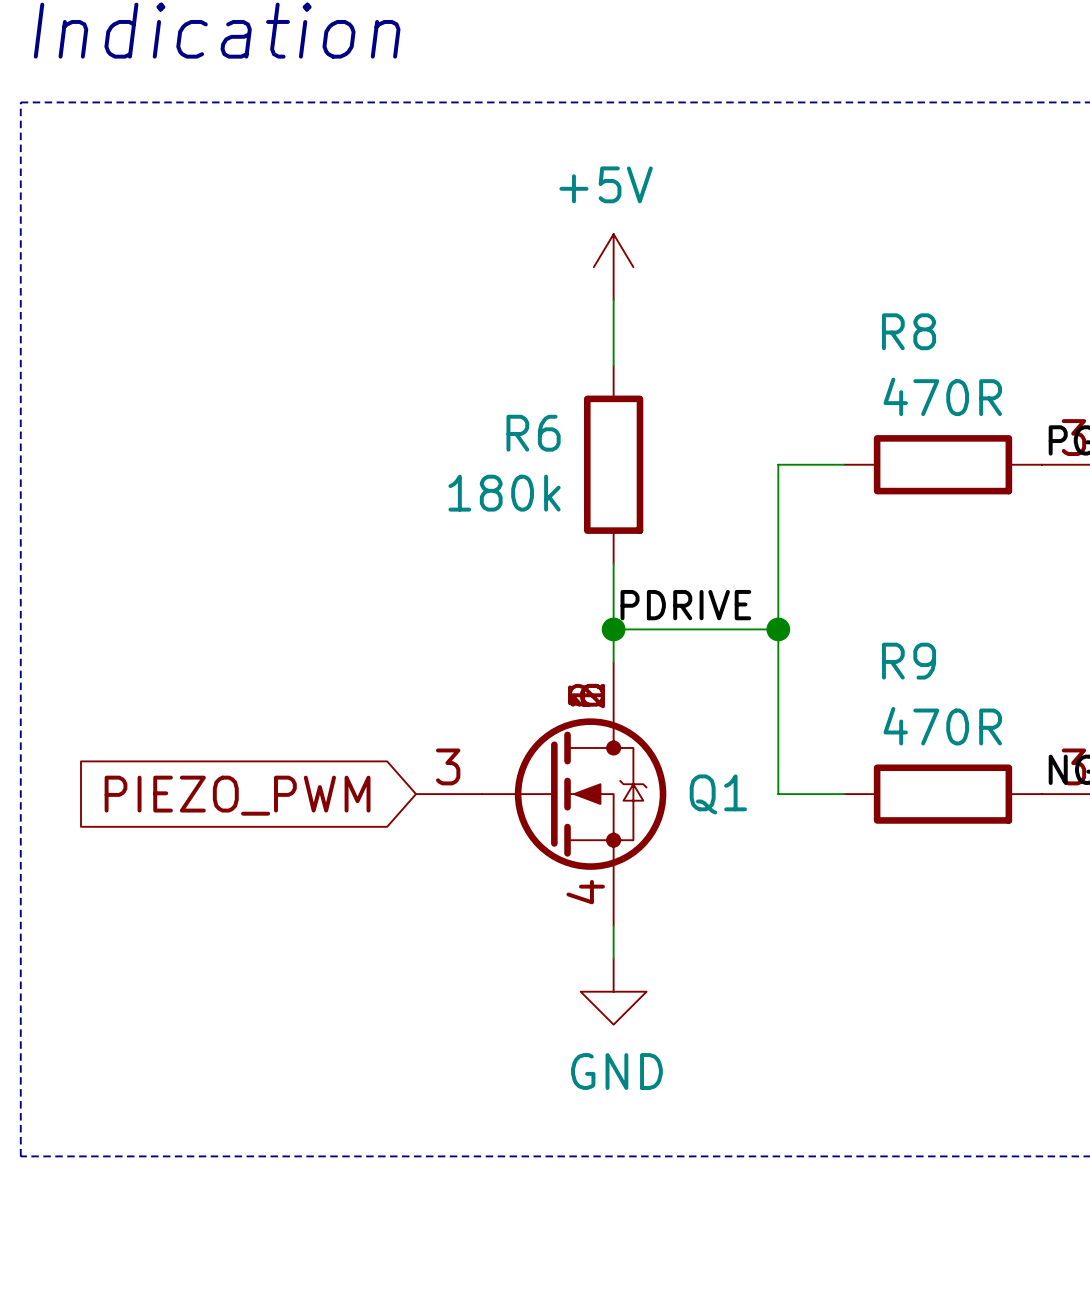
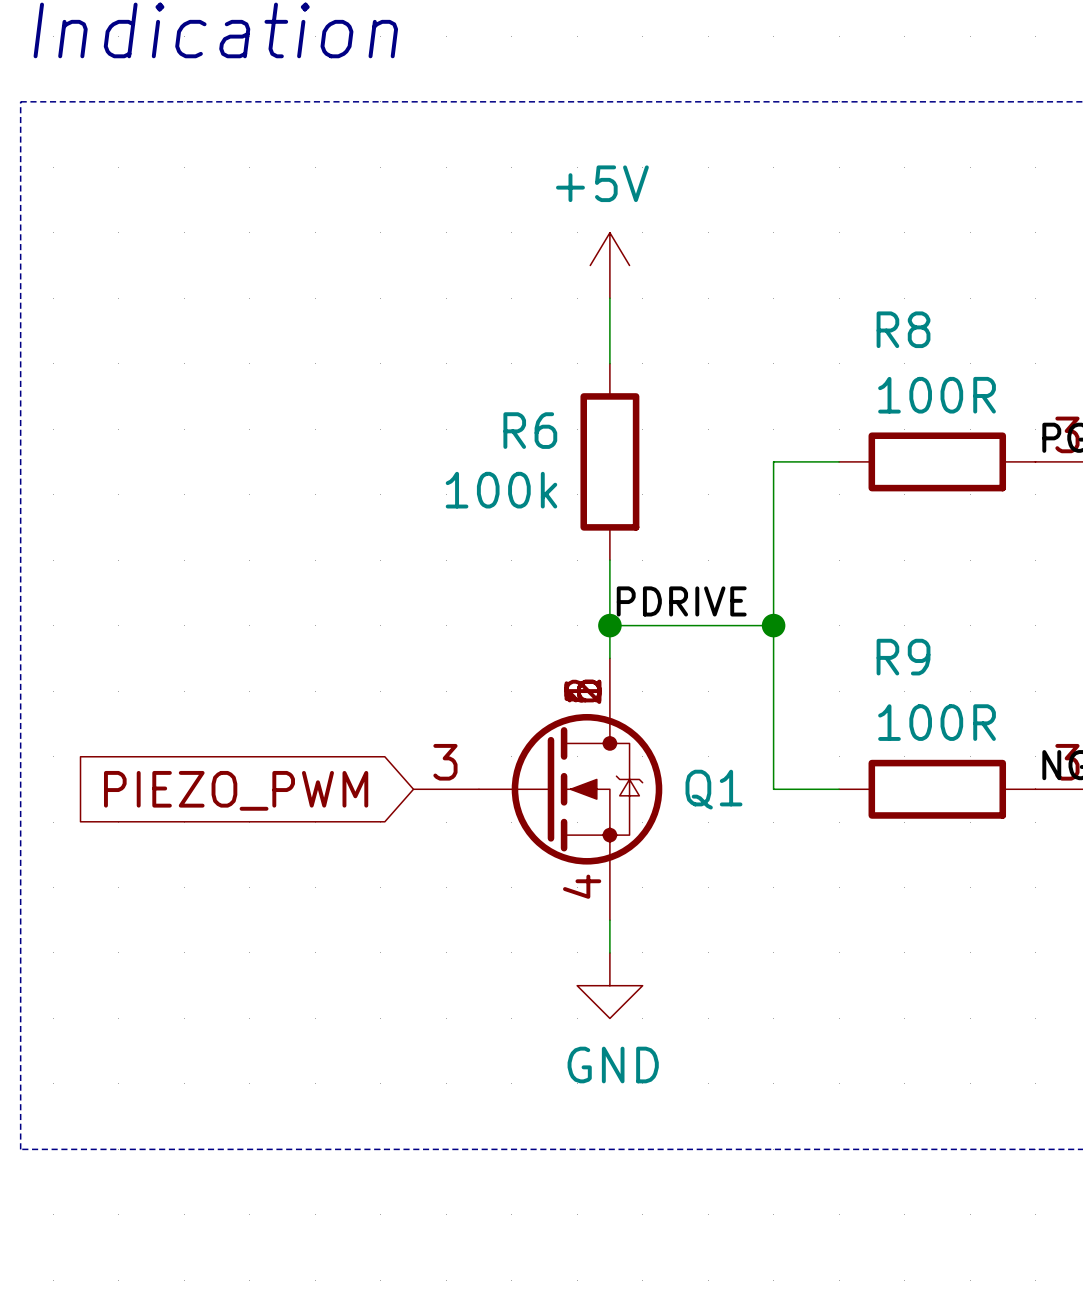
R8 value: 470R (942, 396) -> 100R (937, 395)
R6 value: 180k (504, 493) -> 100k (501, 490)
R9 value: 470R (942, 726) -> 100R (937, 722)

